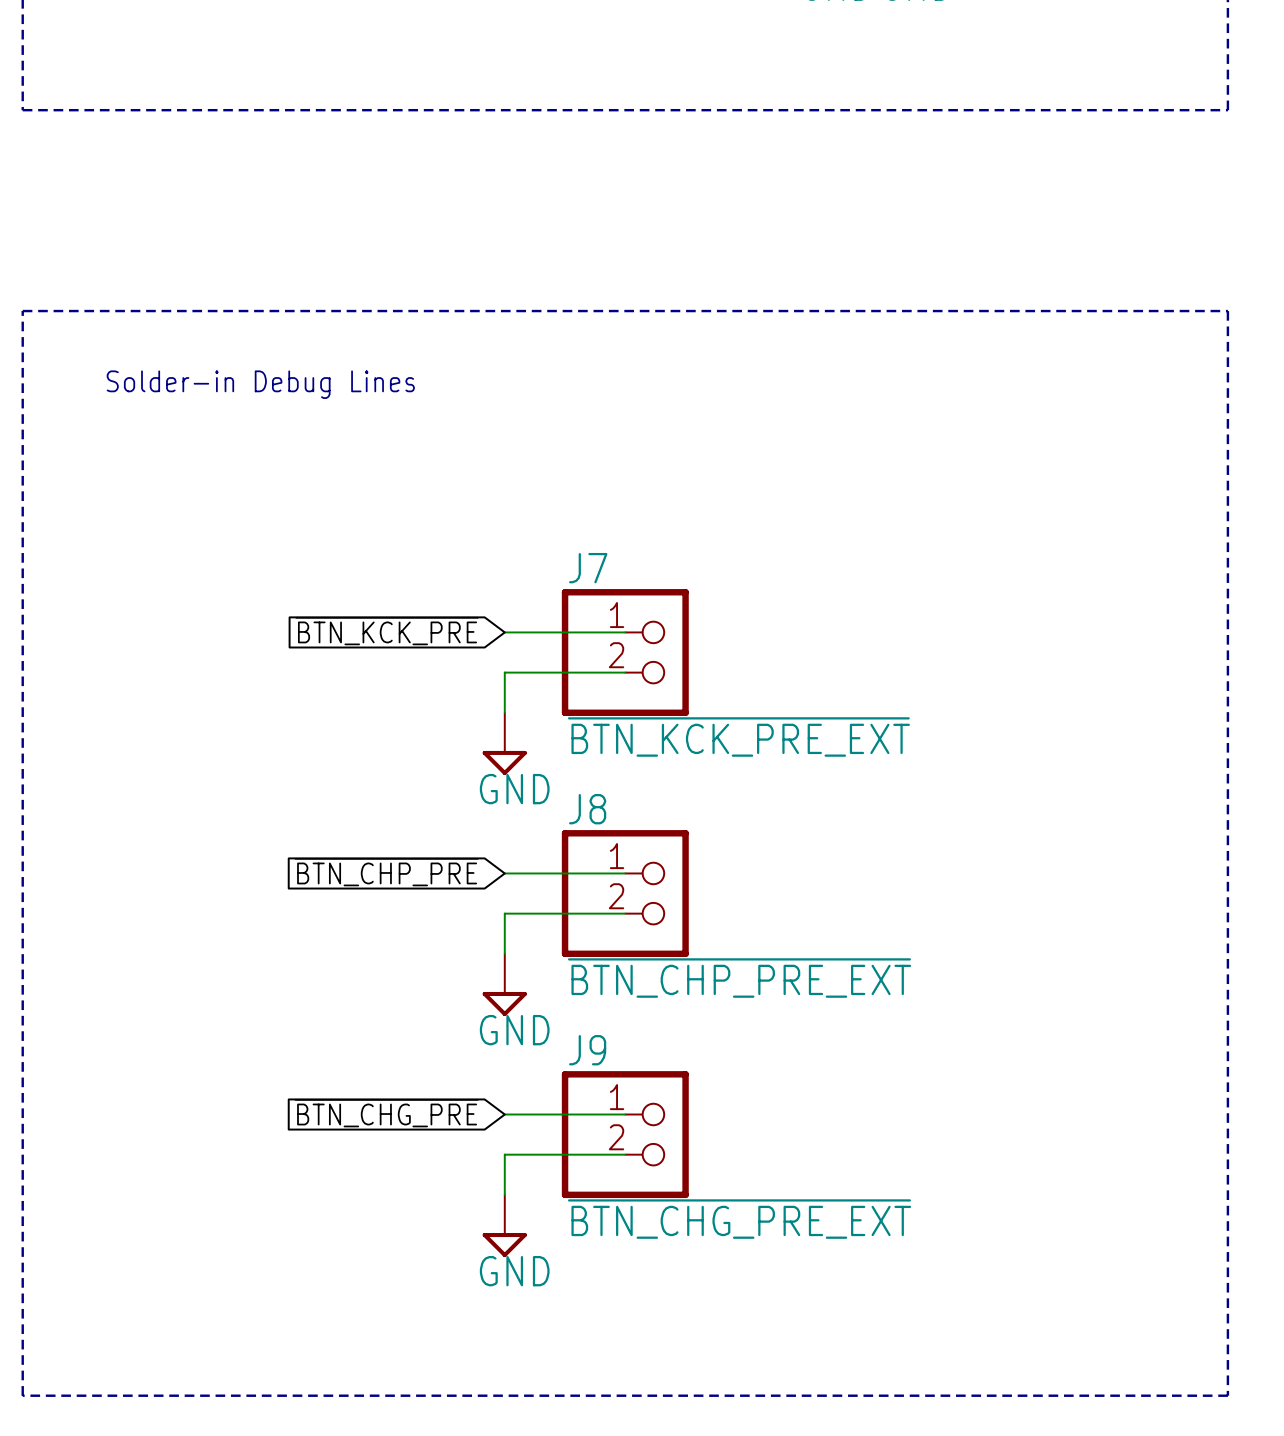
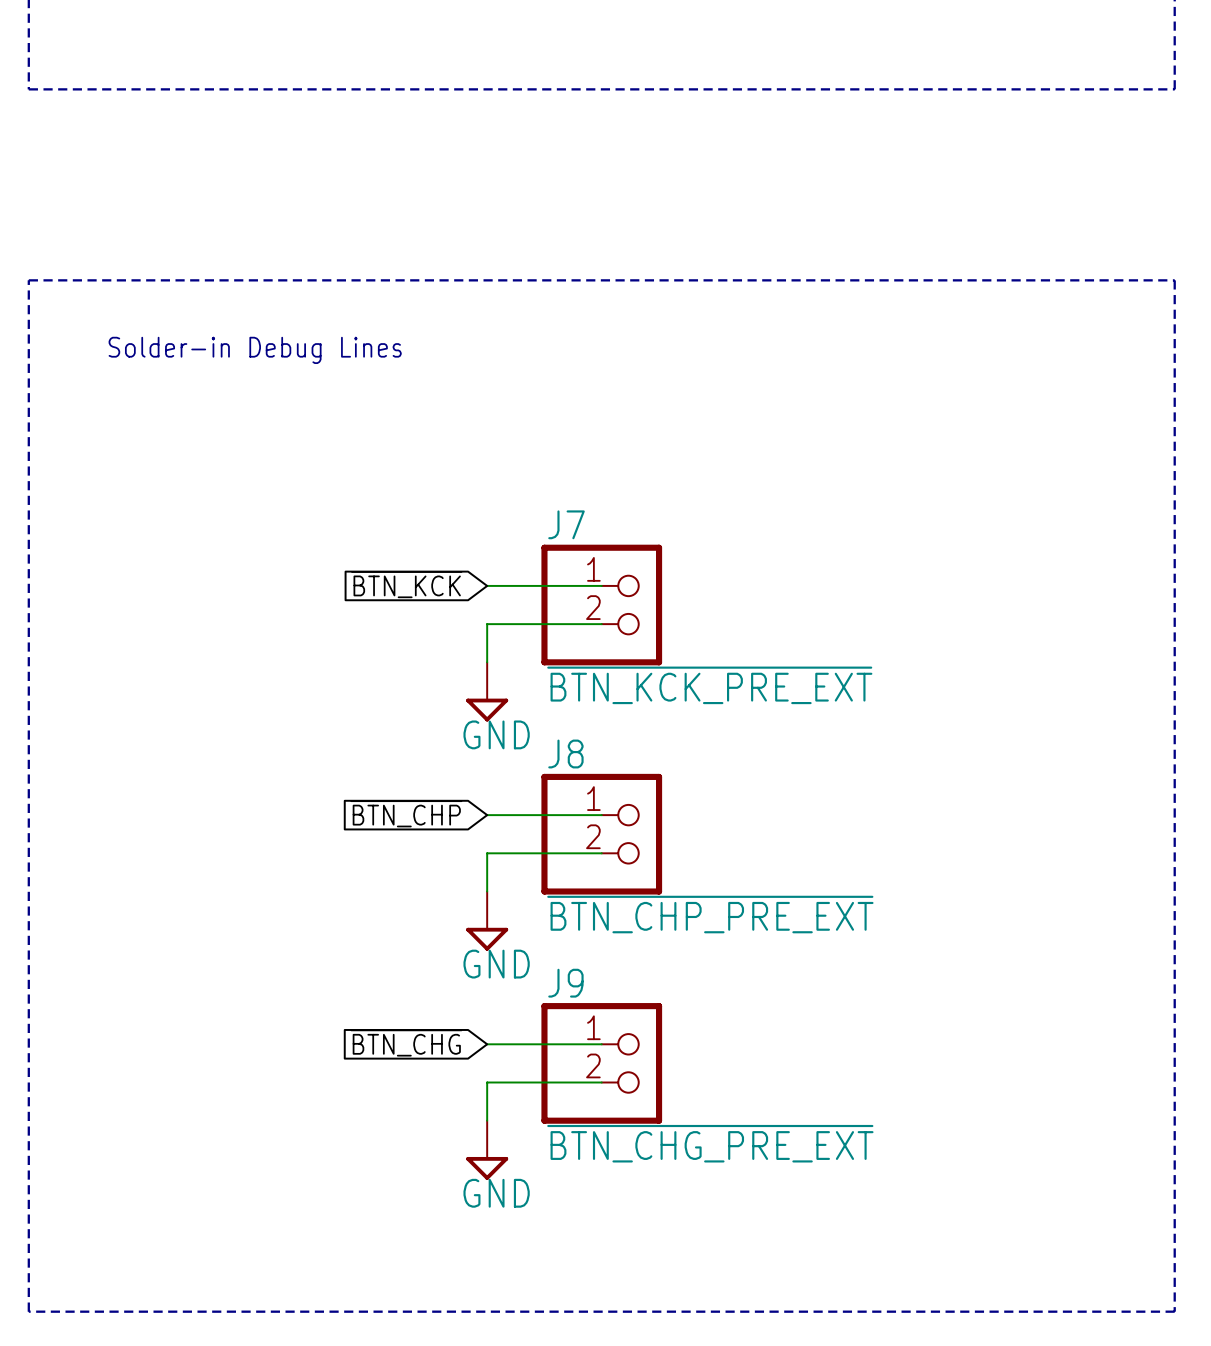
global label: ~{BTN_KCK_PRE} (387, 631) -> ~{BTN_KCK} (406, 584)
global label: ~{BTN_CHP_PRE} (386, 872) -> ~{BTN_CHP} (406, 813)
global label: ~{BTN_CHG_PRE} (386, 1113) -> ~{BTN_CHG} (406, 1043)

